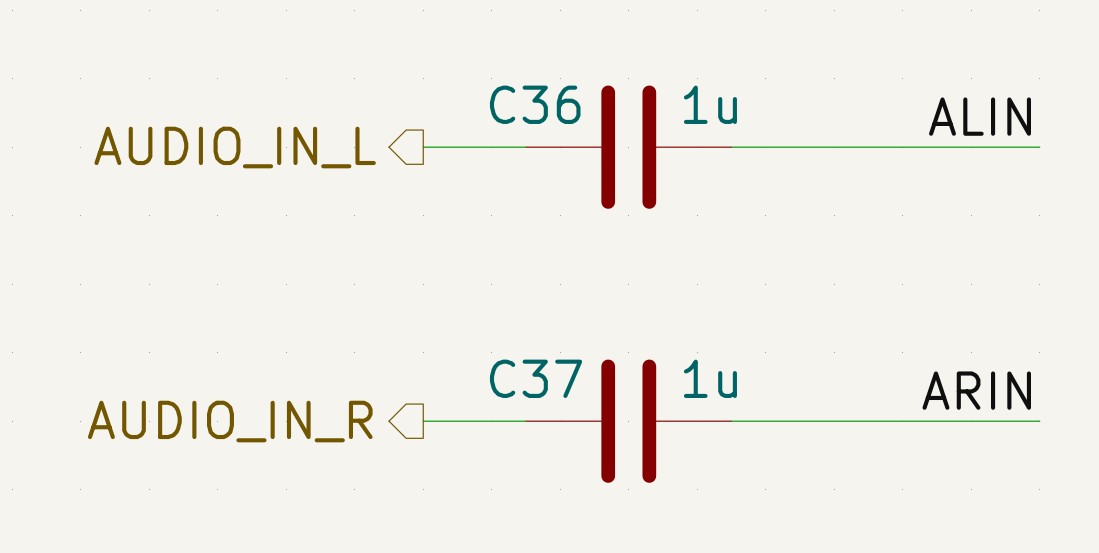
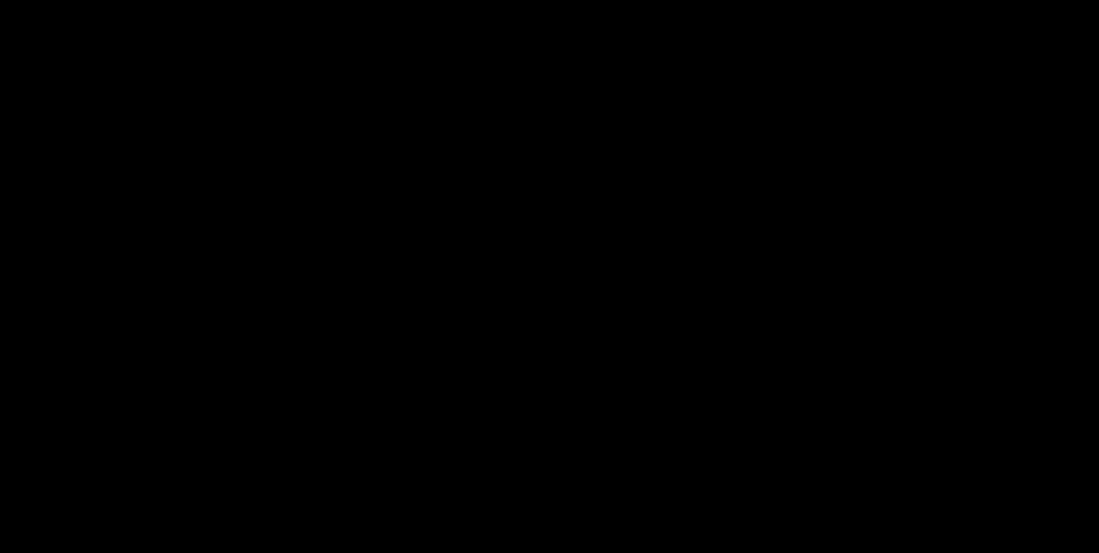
label: ALIN (980, 116) -> none
hierarchical label: AUDIO_IN_L (235, 147) -> none
wire: (423, 147) (526, 147) -> none
C36: 1u (628, 147) -> none
wire: (731, 147) (1039, 147) -> none
label: ARIN (976, 390) -> none
hierarchical label: AUDIO_IN_R (230, 421) -> none
wire: (423, 421) (526, 421) -> none
C37: 1u (628, 421) -> none
wire: (731, 421) (1039, 421) -> none

